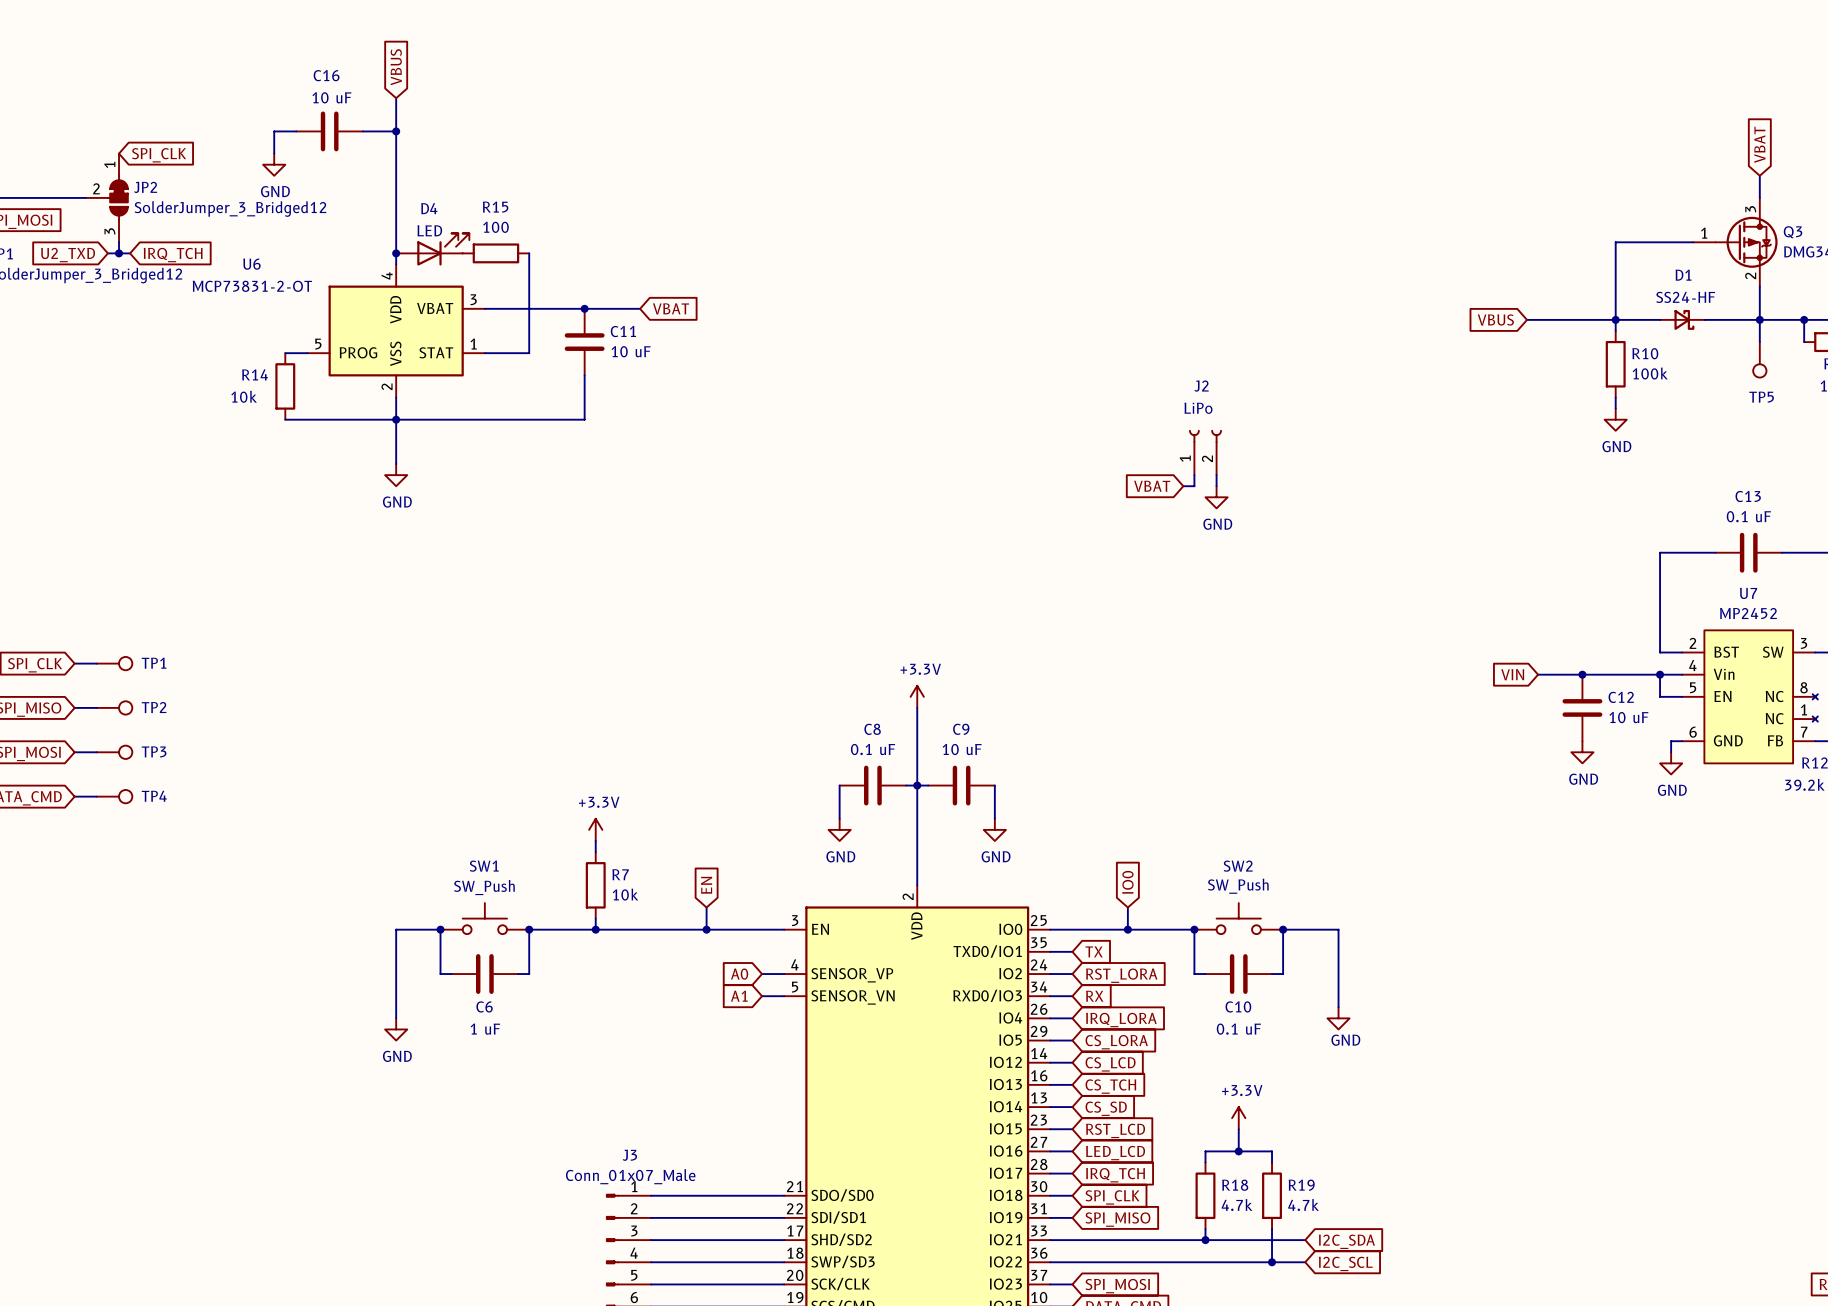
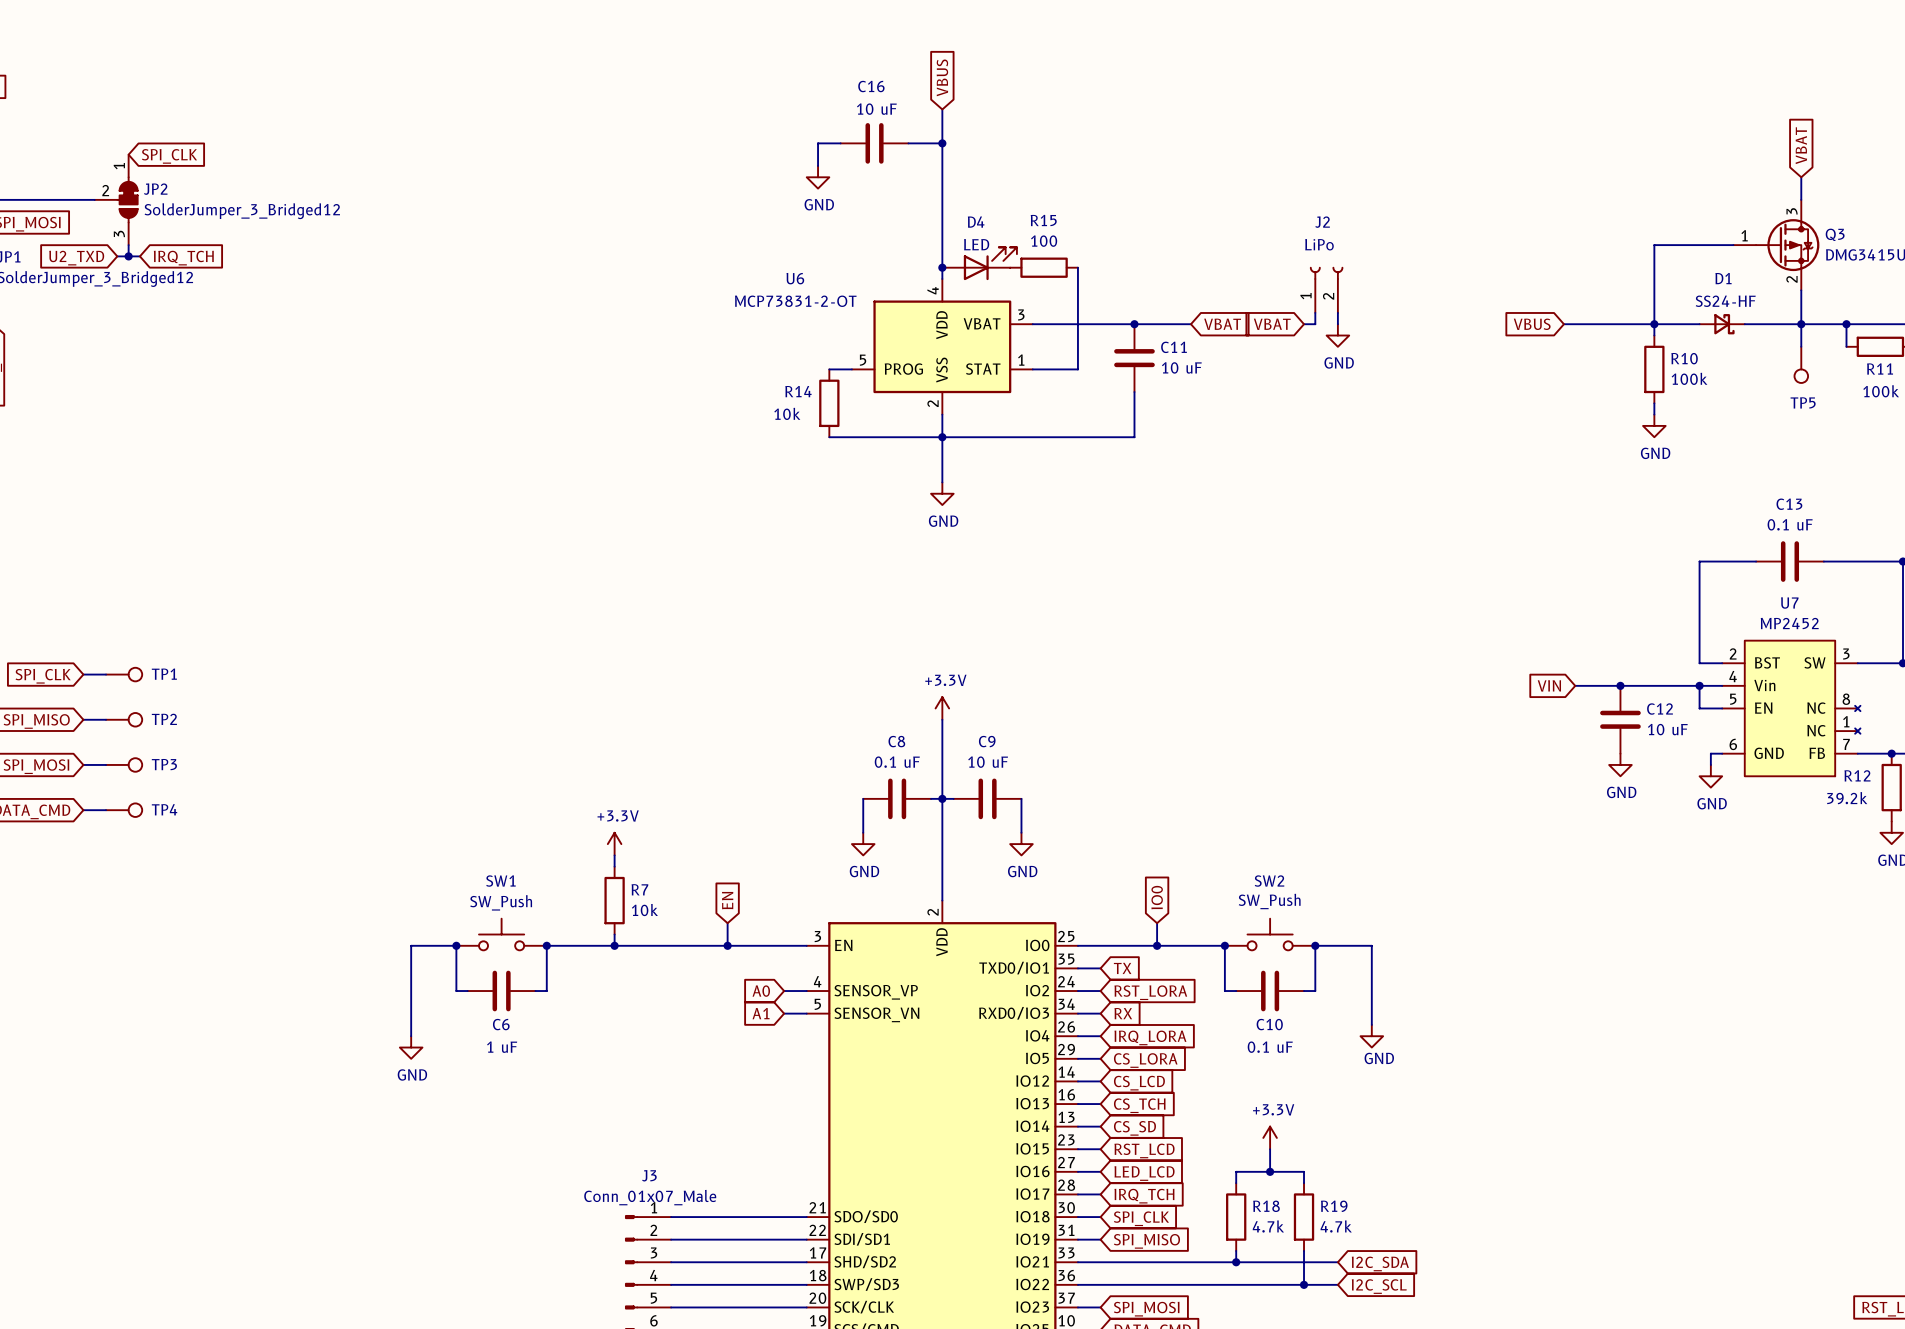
global label: VBUS (396, 67) -> none
global label: none -> VBUS (942, 77)
wire: (396, 98) (396, 264) -> none
wire: none -> (942, 109) (942, 279)
wire: (296, 131) (274, 131) (274, 153) -> none
C16 position: (329, 131) -> (874, 143)
wire: (362, 131) (396, 131) -> none
junction: (396, 131) -> none
wire: none -> (840, 143) (818, 143) (818, 165)
wire: none -> (908, 143) (942, 143)
junction: none -> (942, 143)
power symbol: GND (274, 164) -> none
power symbol: none -> GND (818, 177)
D4 position: (432, 249) -> (979, 263)
junction: (396, 253) -> none
R15 position: (495, 253) -> (1044, 267)
wire: (529, 253) (529, 353) (484, 353) -> none
junction: none -> (942, 267)
wire: none -> (1077, 267) (1077, 369) (1032, 369)
wire: (484, 308) (640, 308) -> none
junction: (584, 308) -> none
global label: VBAT (671, 308) -> none
wire: none -> (1032, 324) (1190, 324)
junction: none -> (1134, 324)
global label: none -> VBAT (1222, 324)
global label: none -> VBAT (1272, 324)
U6 position: (396, 331) -> (942, 346)
power symbol: none -> GND (1337, 335)
C11 position: (584, 342) -> (1134, 358)
wire: (285, 353) (307, 353) -> none
wire: none -> (829, 369) (851, 369)
wire: (584, 375) (584, 419) (285, 419) -> none
R14 position: (285, 386) -> (829, 403)
wire: none -> (1134, 392) (1134, 437) (829, 437)
wire: (396, 397) (396, 464) -> none
wire: none -> (942, 414) (942, 482)
junction: (396, 419) -> none
junction: none -> (942, 437)
J2 position: (1205, 452) -> (1326, 289)
power symbol: GND (396, 475) -> none
wire: (1194, 475) (1194, 486) (1183, 486) -> (1315, 312) (1315, 324) (1304, 324)
wire: (1216, 475) (1216, 486) -> (1337, 312) (1337, 324)
power symbol: none -> GND (942, 493)
global label: VBAT (1152, 486) -> none
power symbol: GND (1216, 497) -> none

